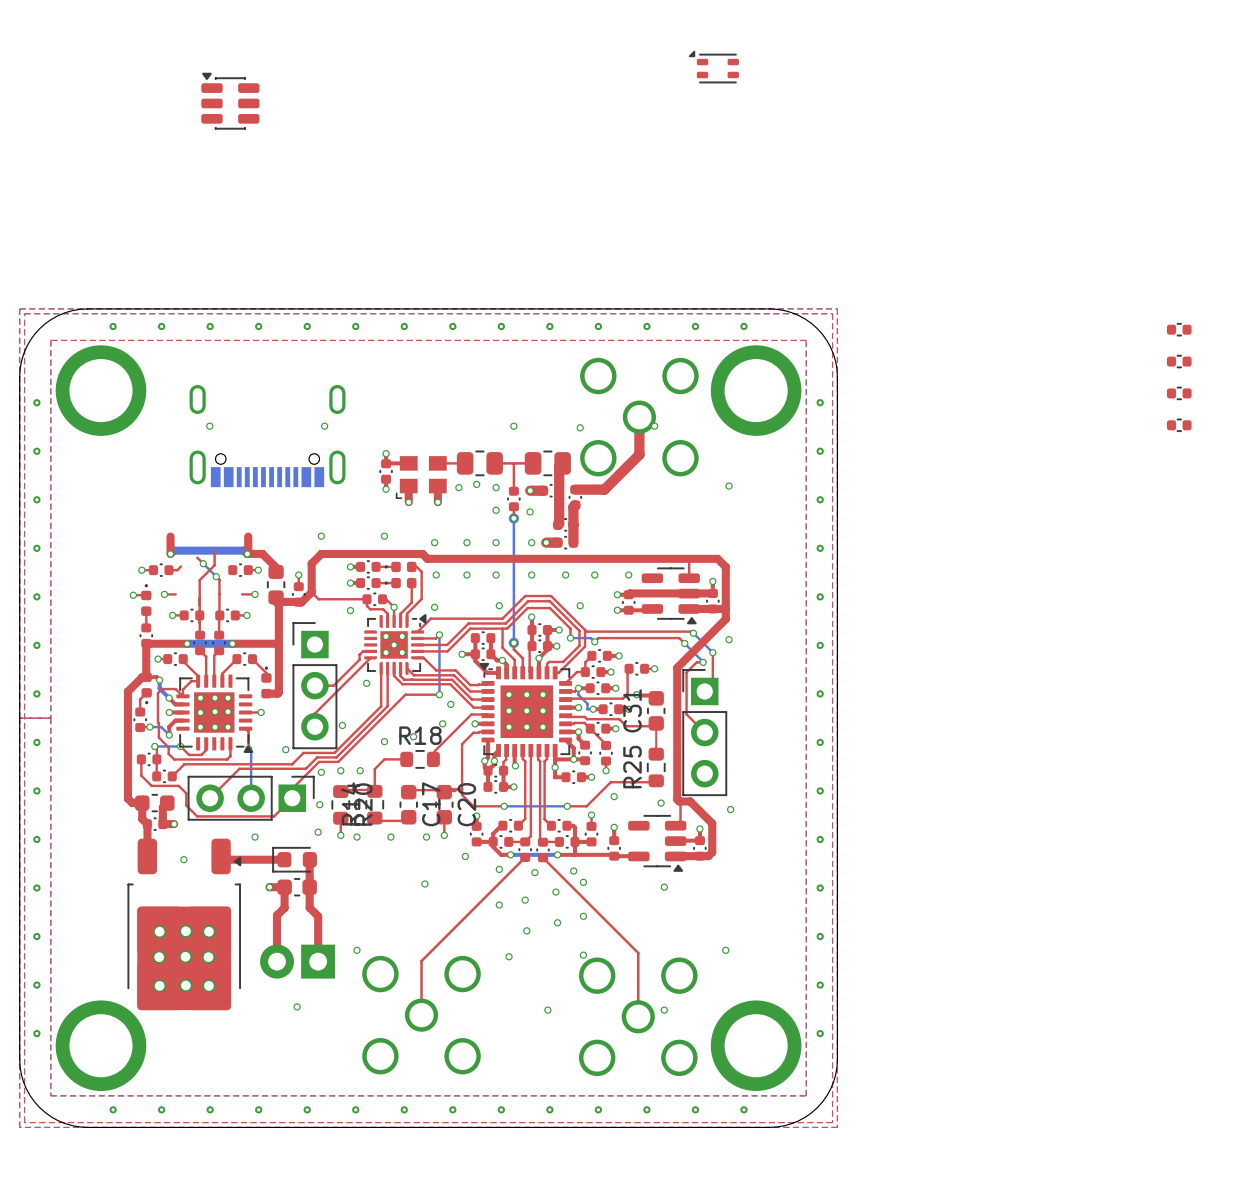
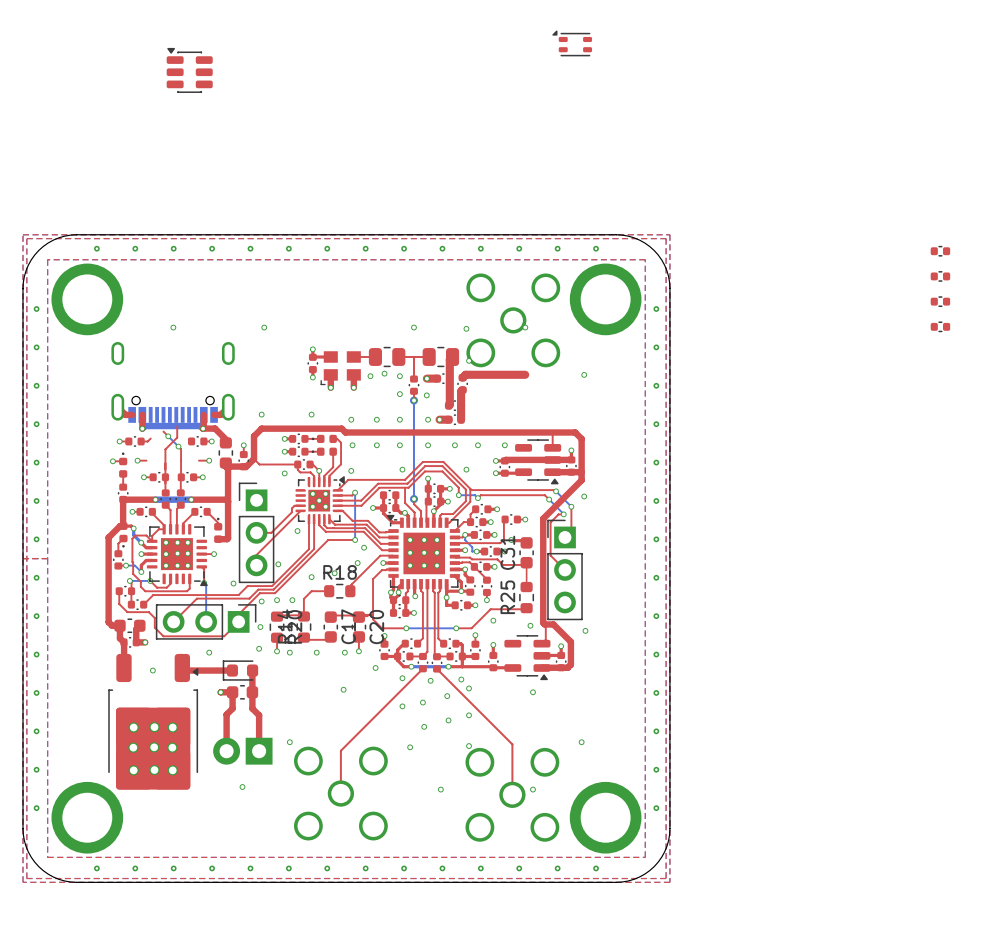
top track: (639, 417) (639, 454) (604, 489) (575, 489) -> (525, 374) (465, 374) (462, 377)
part position: (267, 436) -> (173, 382)
via: none -> (469, 360)
top track: none -> (117, 407) (125, 414) (132, 416)
top track: none -> (228, 407) (220, 414) (214, 414)

